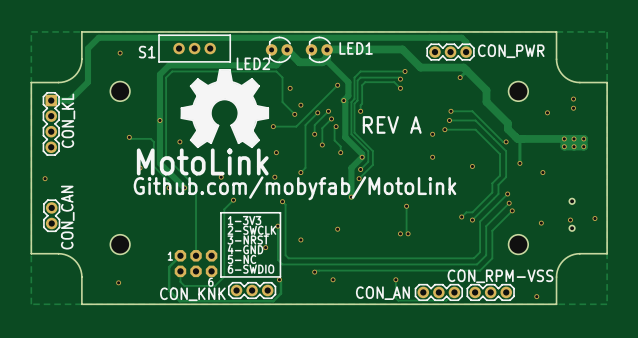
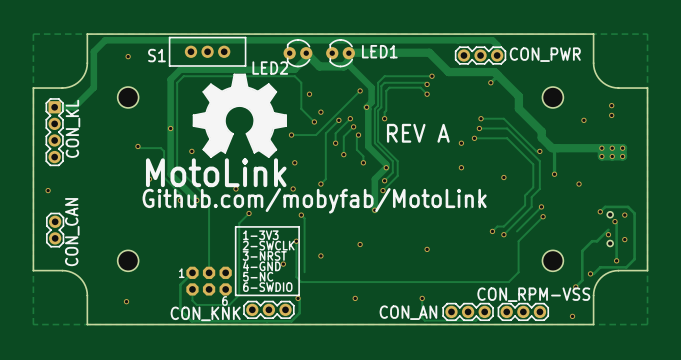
track: none -> (600, 211) (605, 206) (628, 206) (634, 213) (634, 259) (626, 267) (600, 267) (593, 273) (590, 273)
via: none -> (600, 211)
via: none -> (624, 215)
track: (406, 206) (408, 233) -> none
via: (406, 206) -> none
track: none -> (614, 221) (616, 223) (616, 260)
via: none -> (614, 221)
track: (512, 210) (492, 230) (492, 258) (480, 270) (316, 270) (314, 272) -> none
via: (512, 210) -> none
track: none -> (608, 229) (597, 241) (592, 241) (582, 251) (582, 280) (575, 286)
track: (484, 216) (480, 221) (480, 252) (473, 258) (288, 258) (285, 255) -> none
via: (594, 218) -> none
via: (541, 223) -> none
via: none -> (624, 239)
via: (408, 233) -> none
via: none -> (616, 260)
via: none -> (590, 273)
via: none -> (575, 286)
via: (314, 272) -> none

